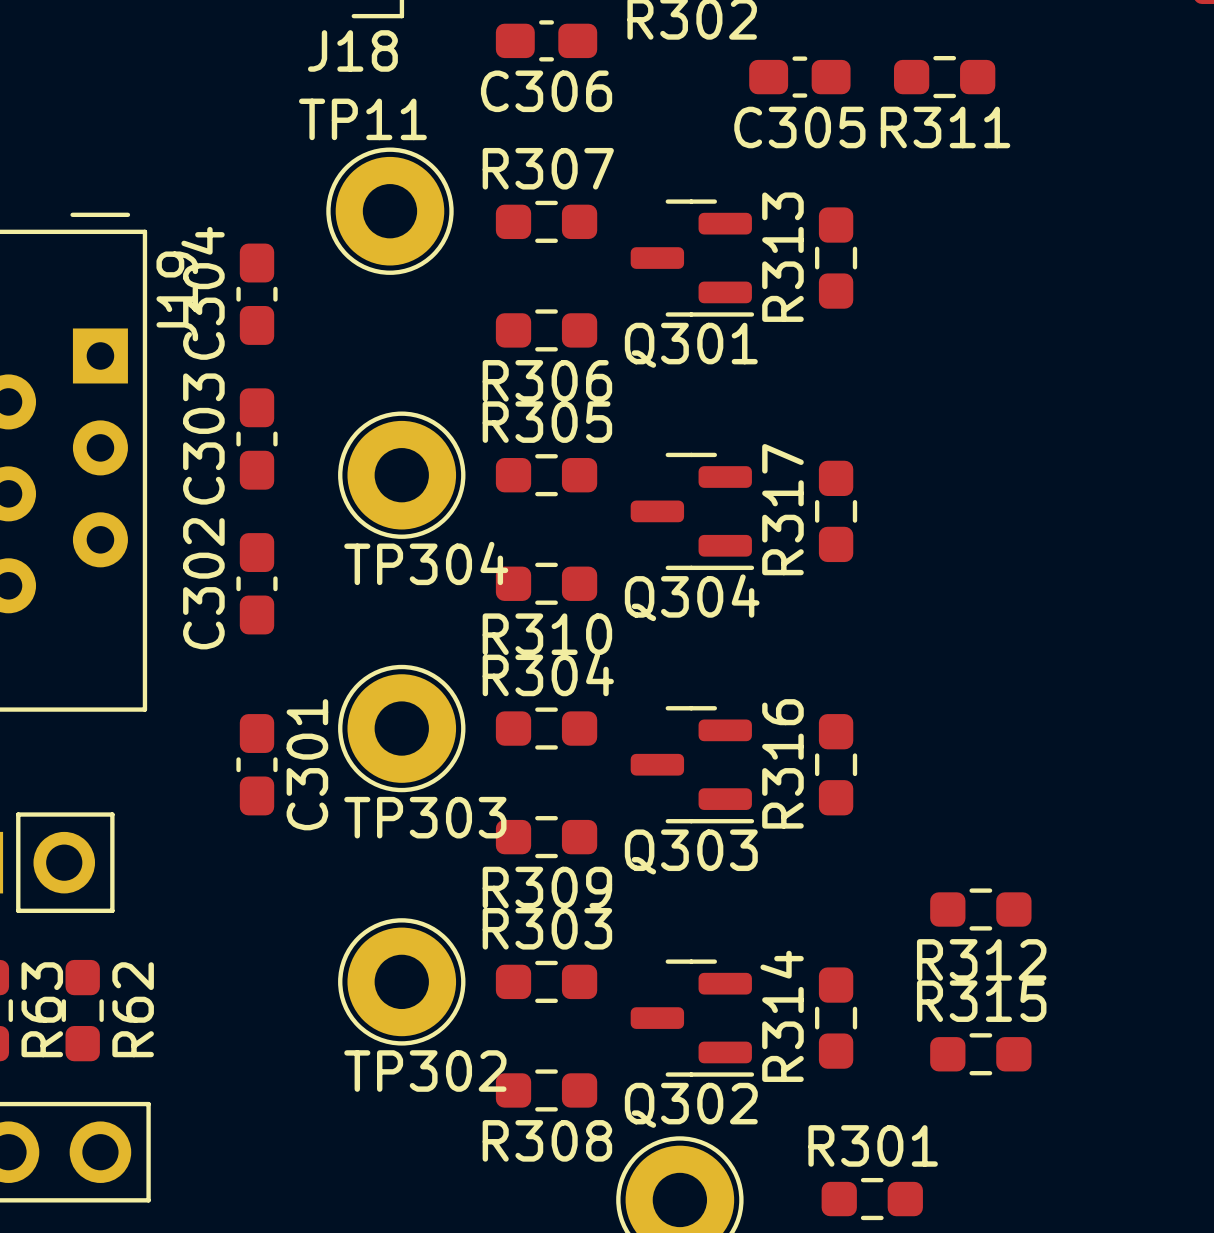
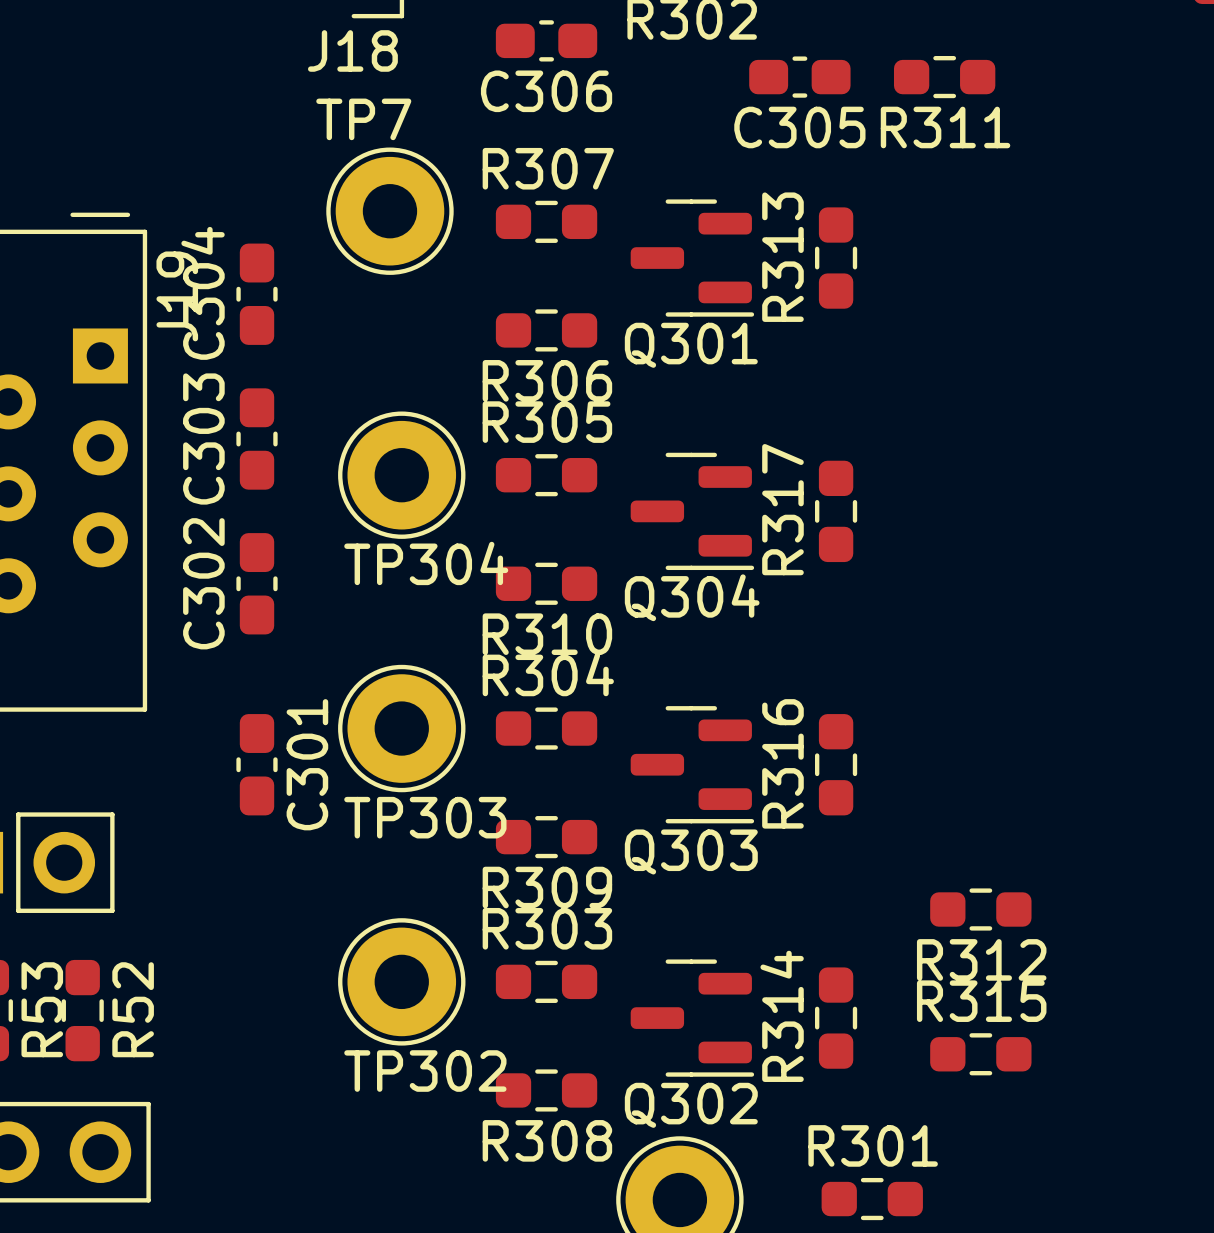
TP11 name: TP11 (362, 119) -> TP7 (363, 119)
R63 name: R63 (42, 1009) -> R53 (42, 1009)
R62 name: R62 (133, 1009) -> R52 (133, 1009)

